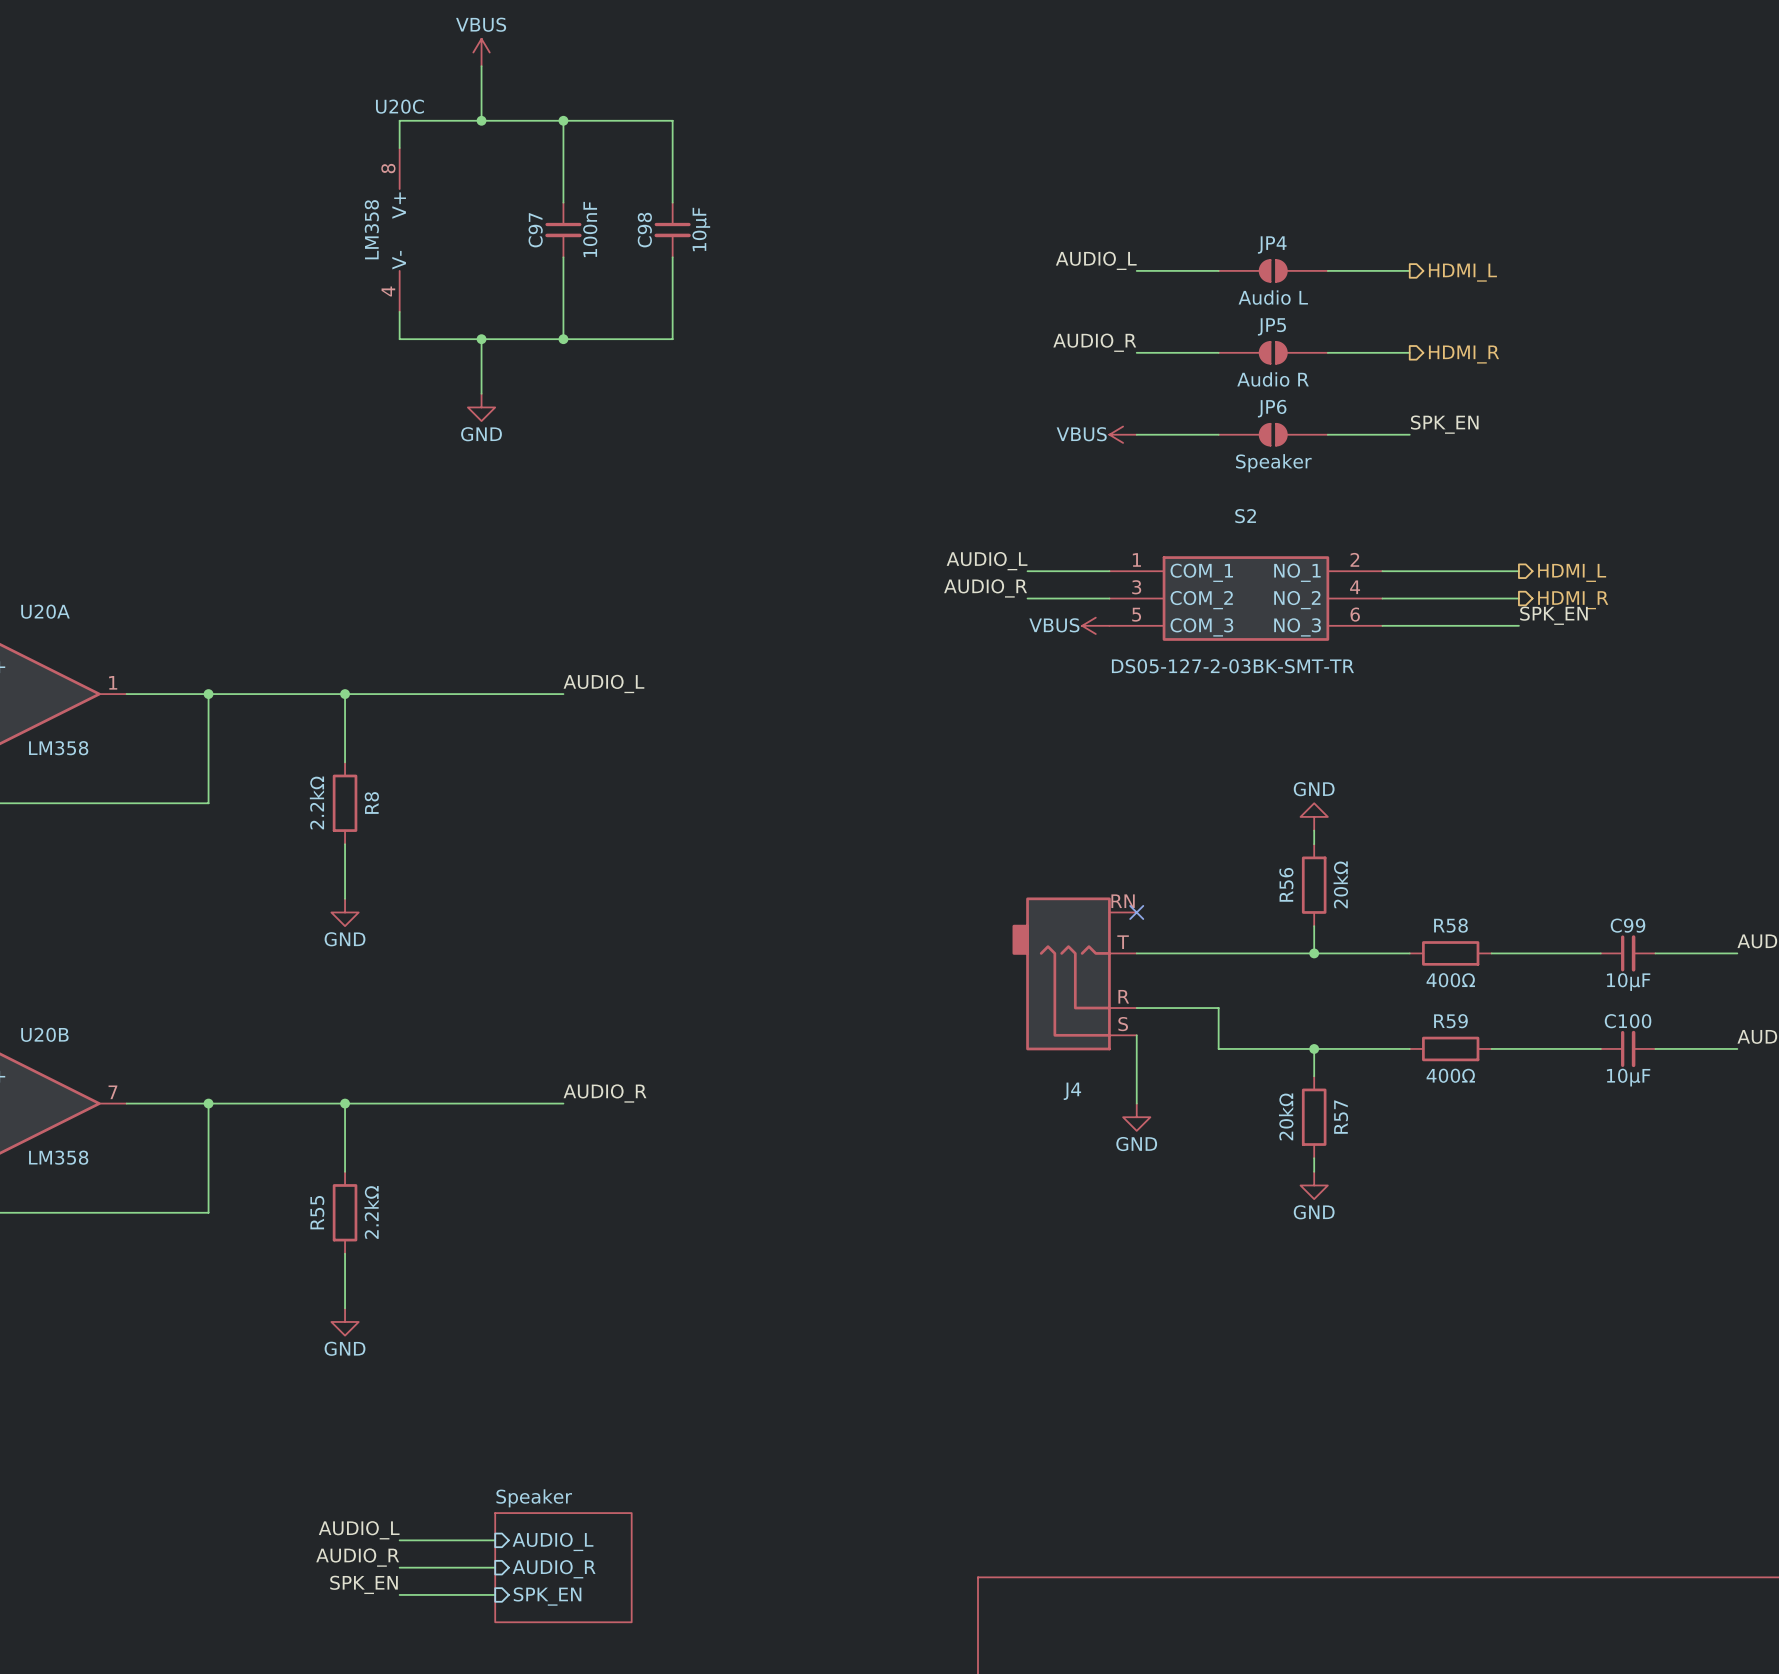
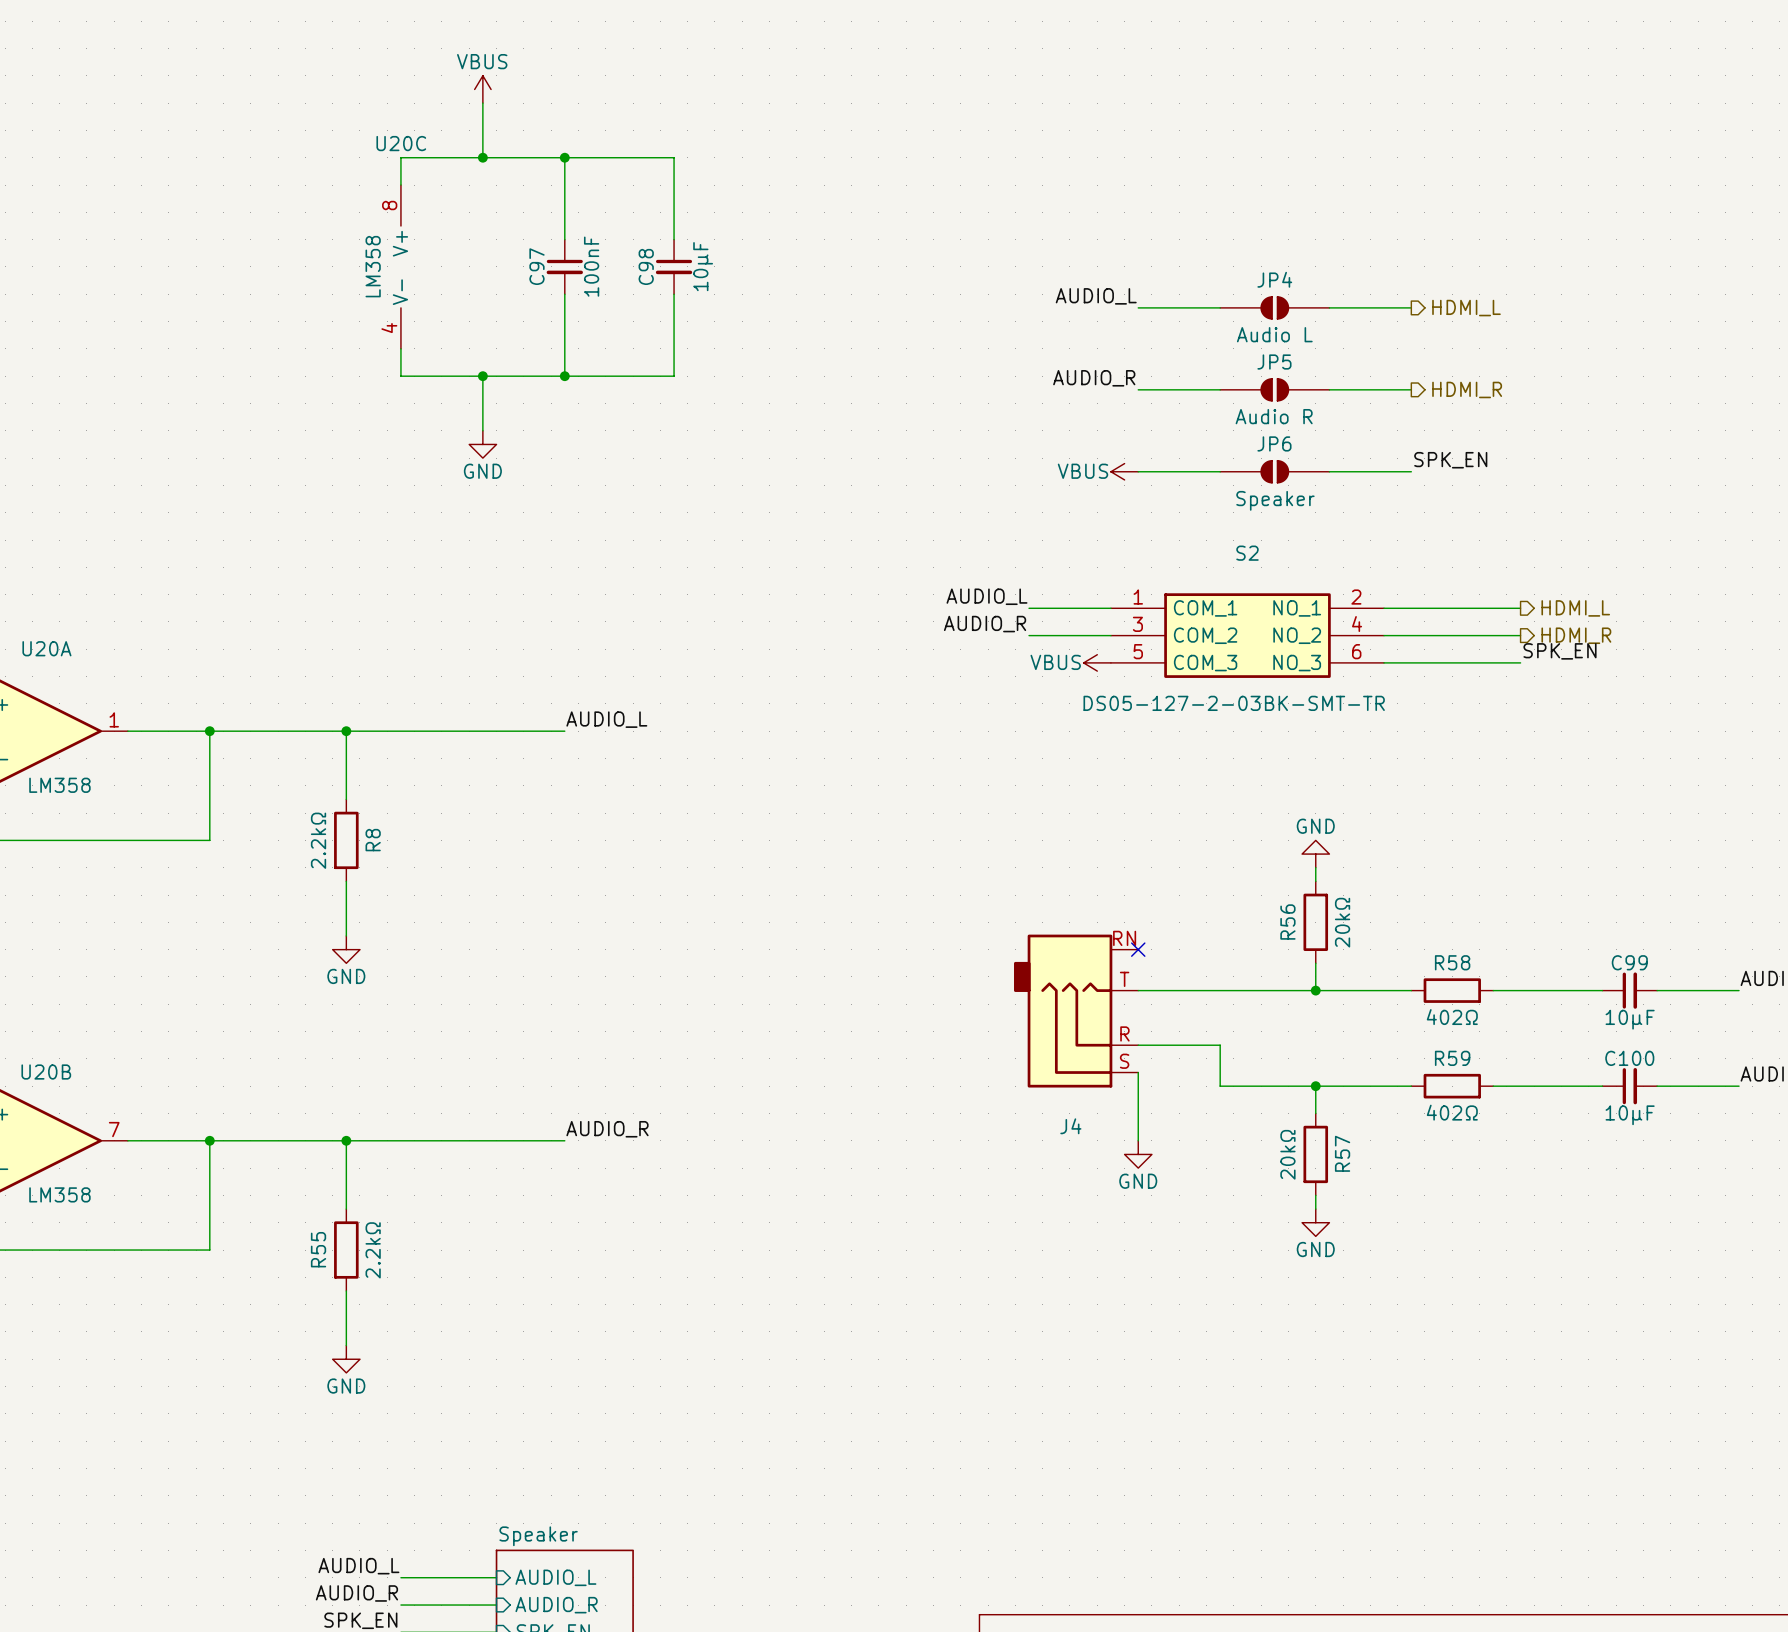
R58 value: 400Ω (1450, 980) -> 402Ω (1452, 1017)
R59 value: 400Ω (1450, 1075) -> 402Ω (1452, 1112)

